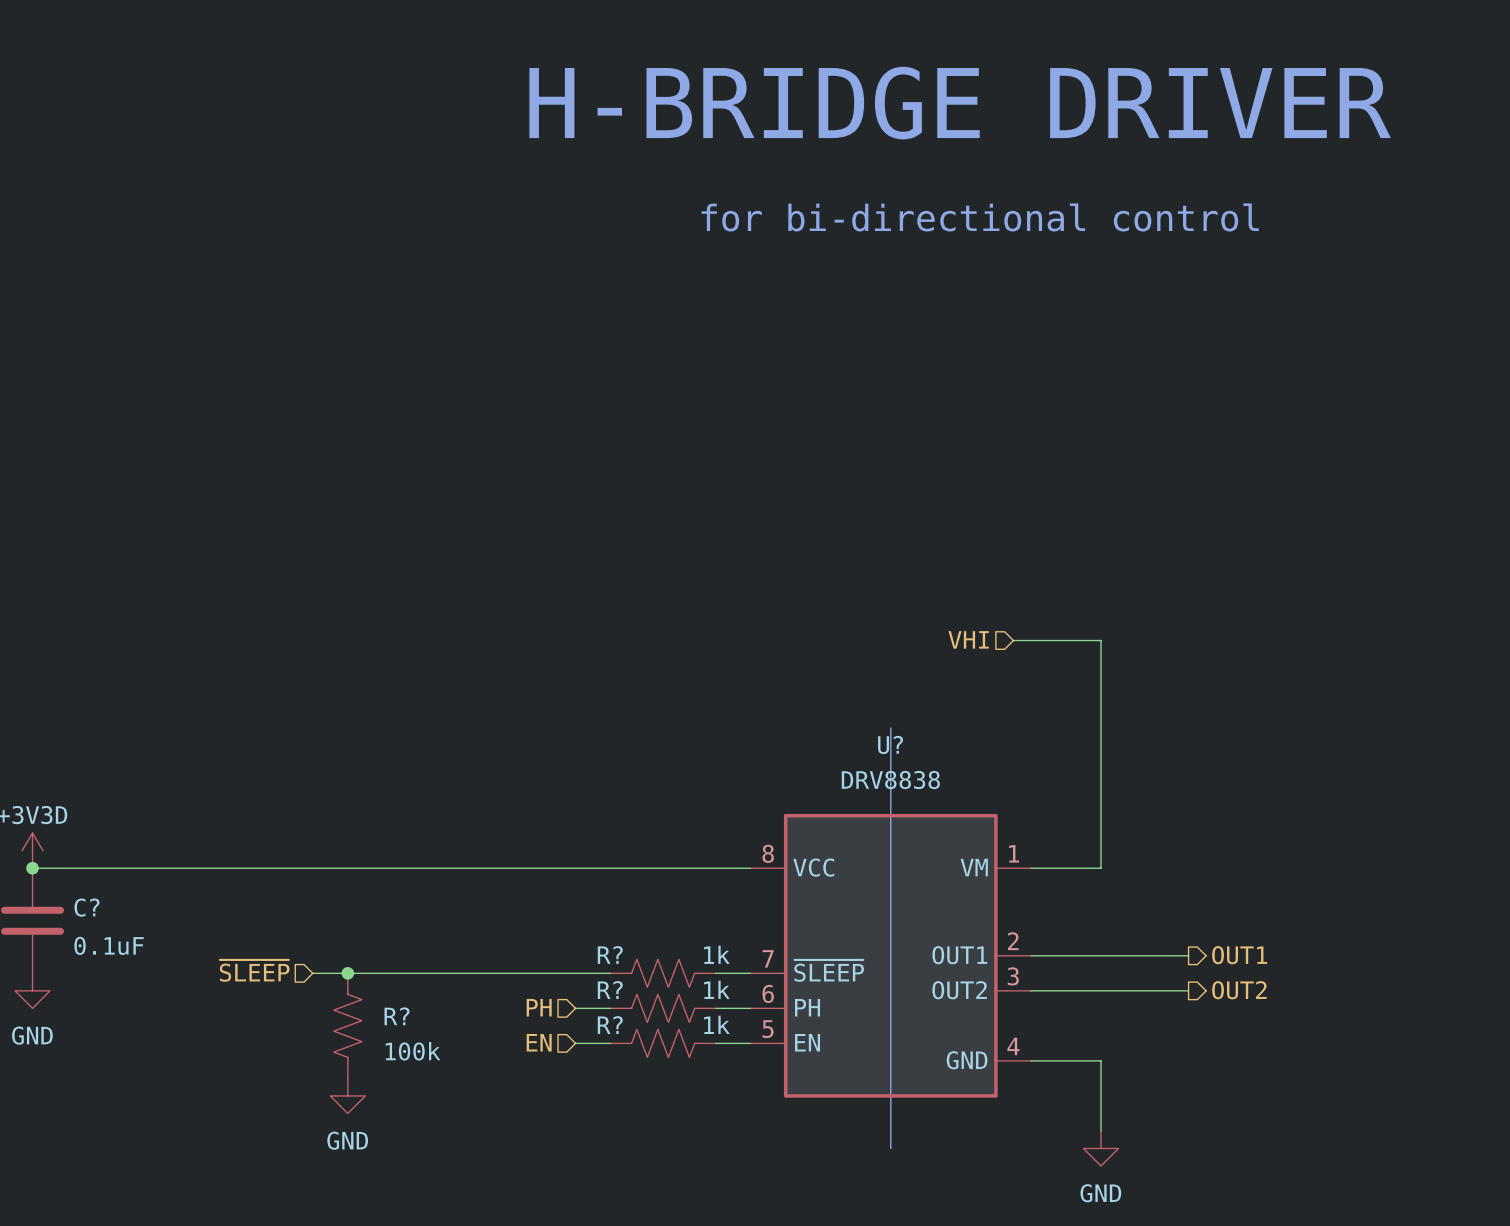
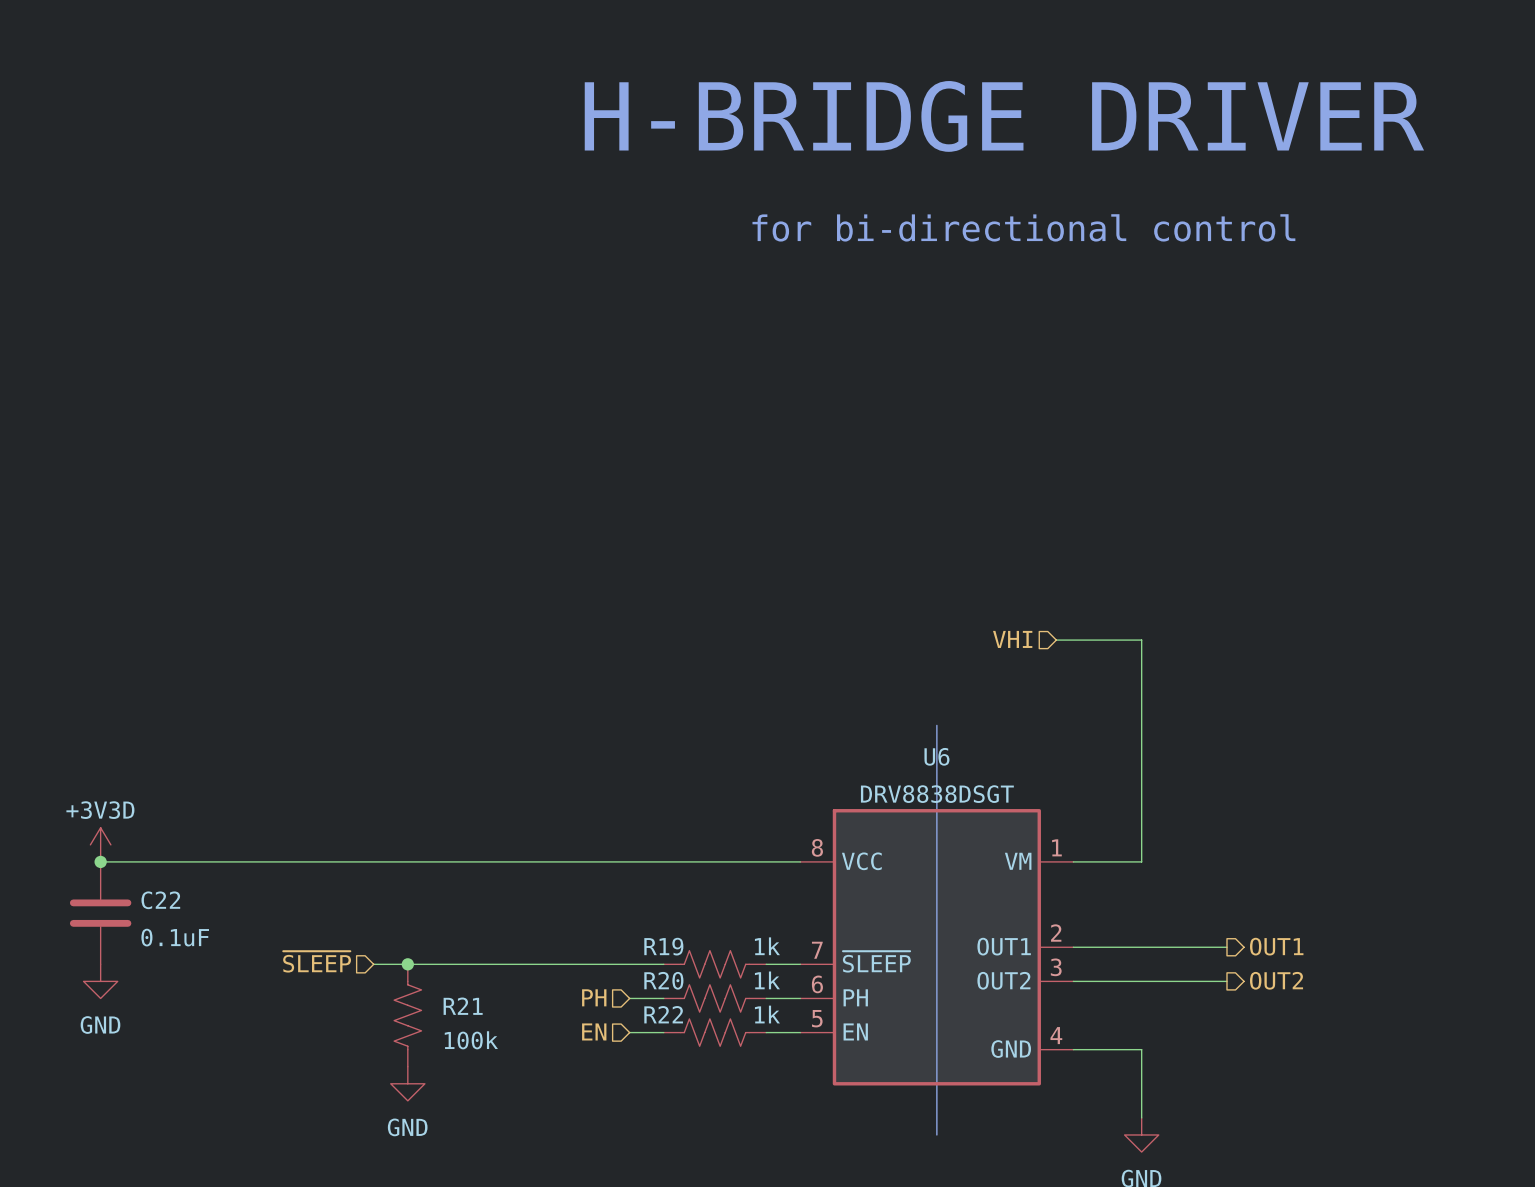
U? name: U? (890, 744) -> U6 (936, 756)
U? value: DRV8838 (890, 780) -> DRV8838DSGT (937, 794)
C? name: C? (86, 907) -> C22 (160, 900)
R? name: R? (610, 955) -> R19 (663, 946)
R? name: R? (610, 990) -> R20 (663, 980)
R? name: R? (397, 1016) -> R21 (463, 1006)
R? name: R? (610, 1025) -> R22 (663, 1014)

